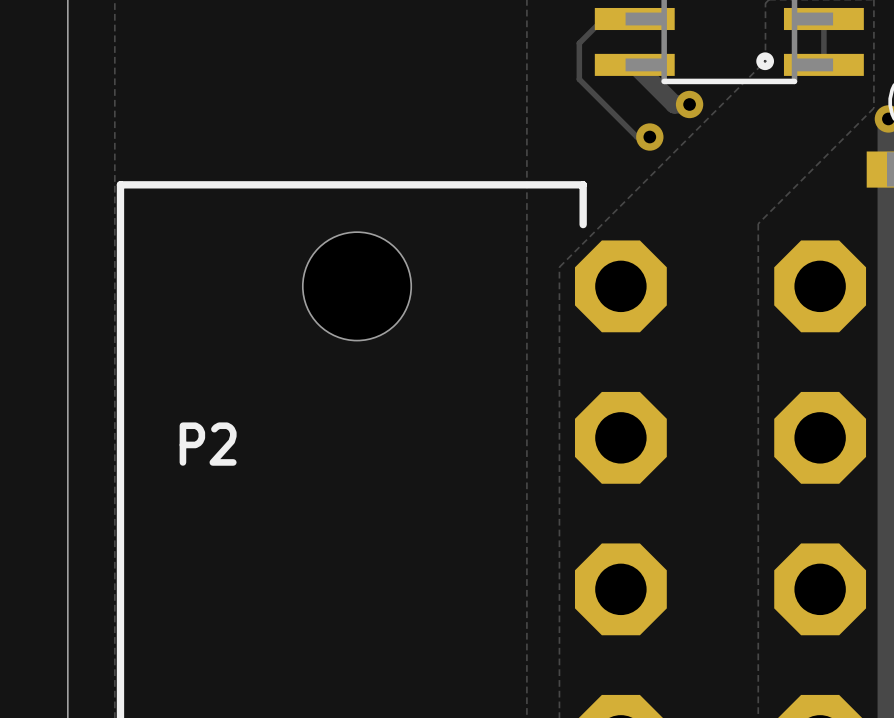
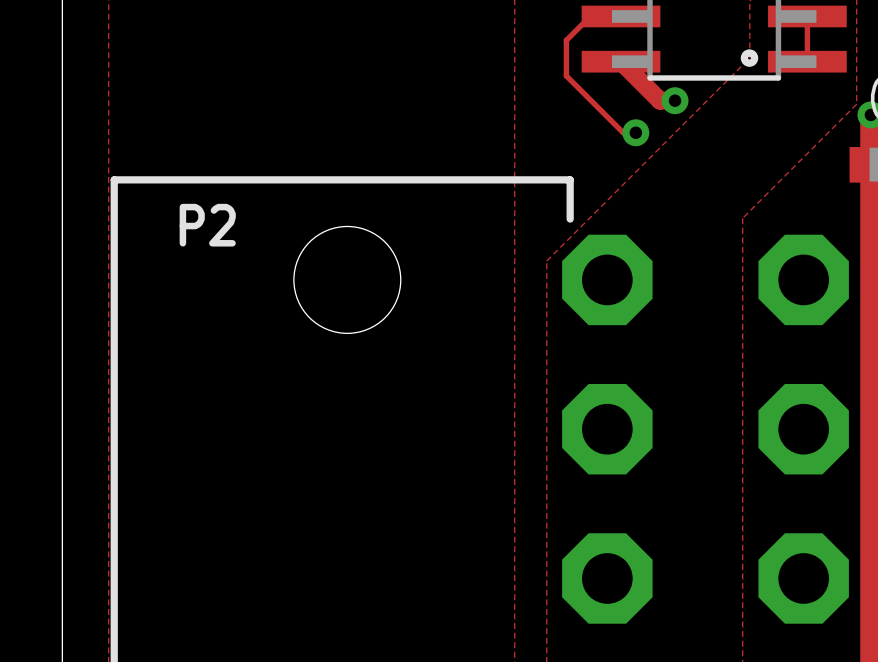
P2 name position: P2 (208, 444) -> P2 (207, 225)

